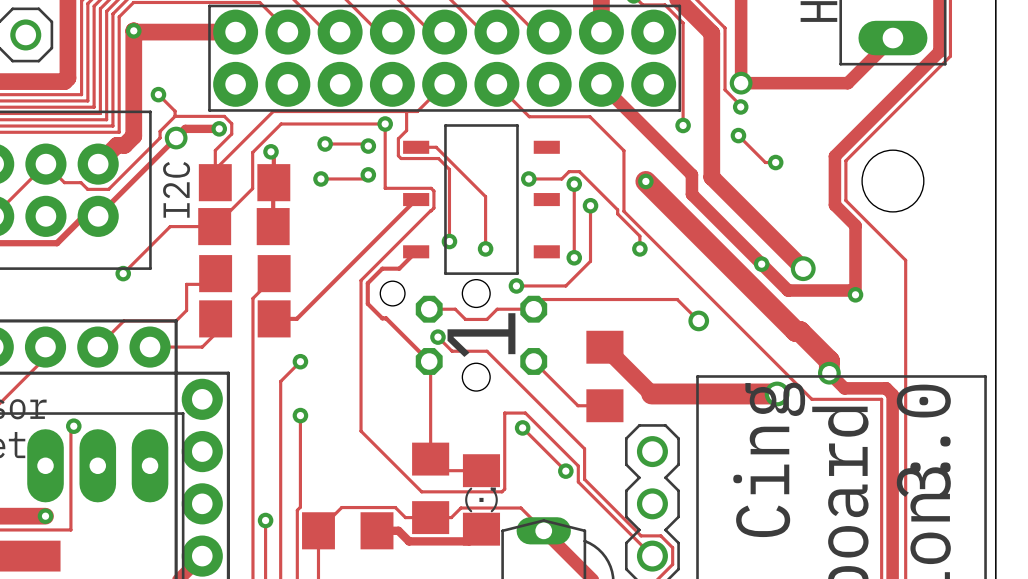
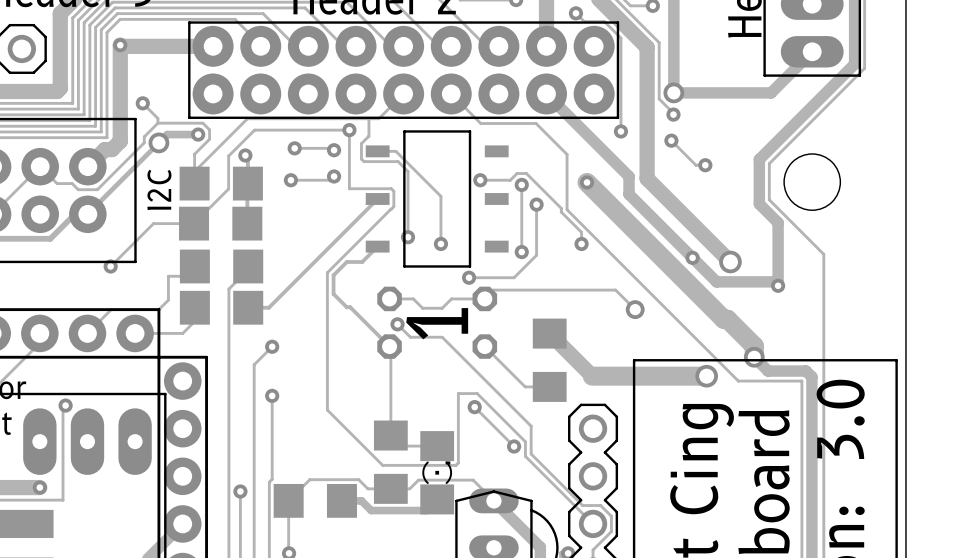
part footprint: [380, 279, 548, 392] -> [377, 286, 498, 359]

